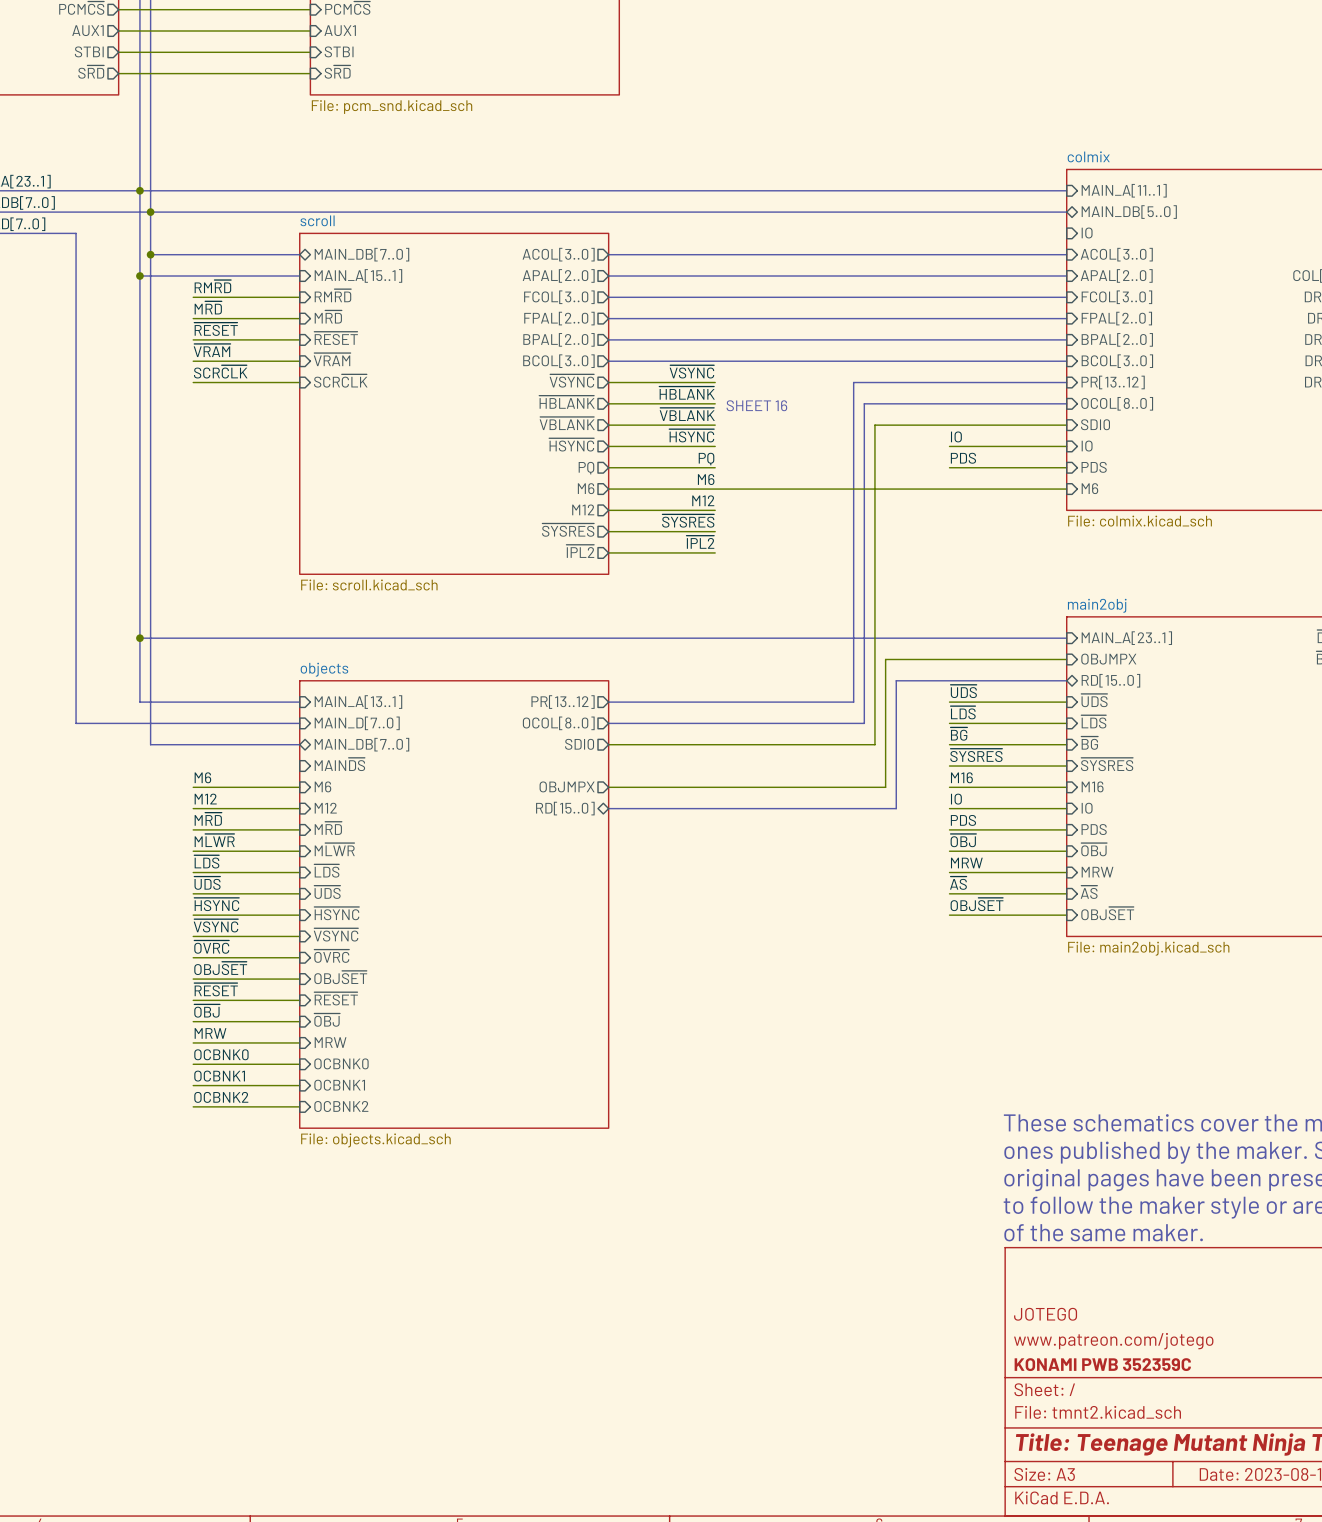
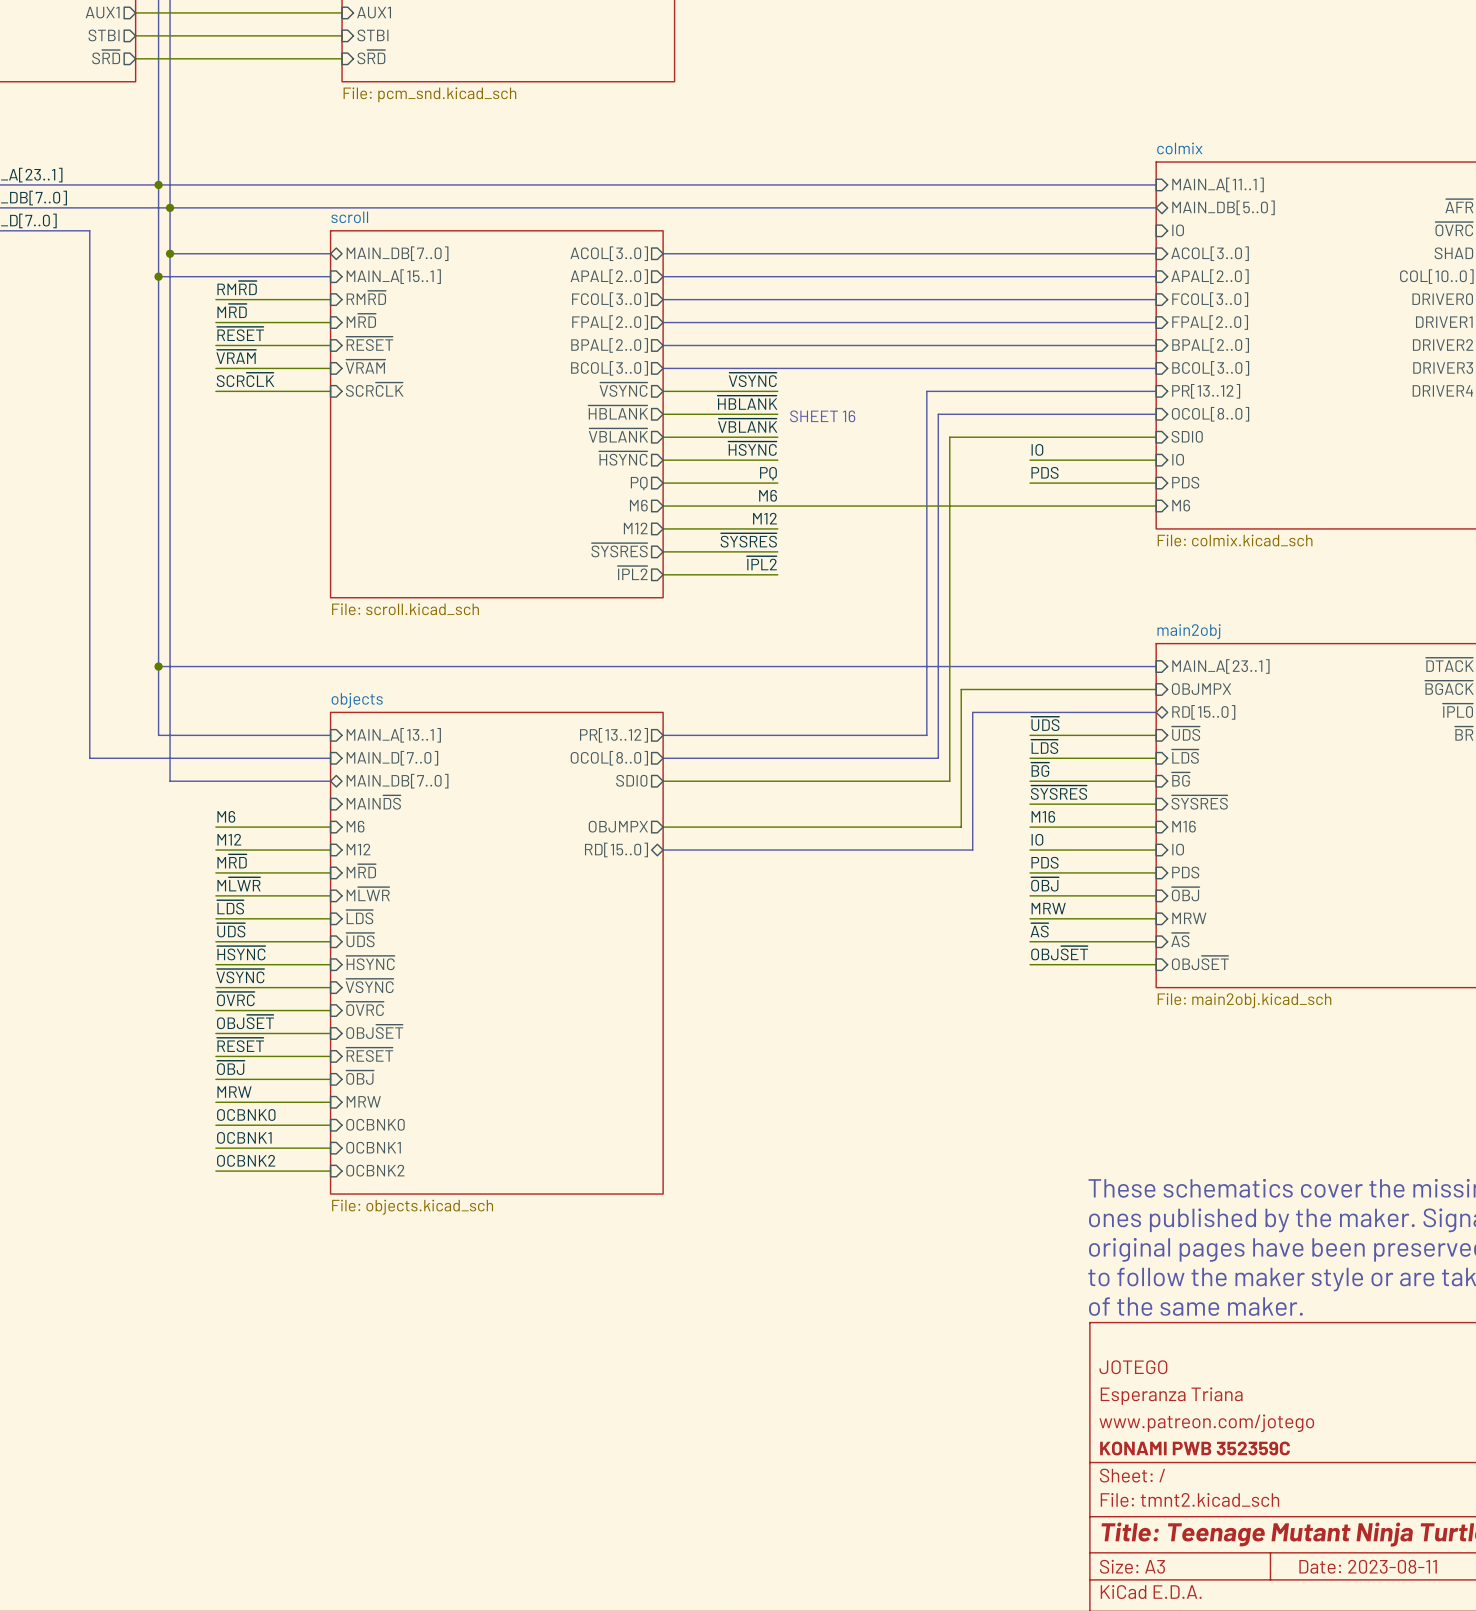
title block: none -> JOTEGO (1133, 1367)
title block: JOTEGO (1045, 1314) -> Esperanza Triana (1171, 1396)

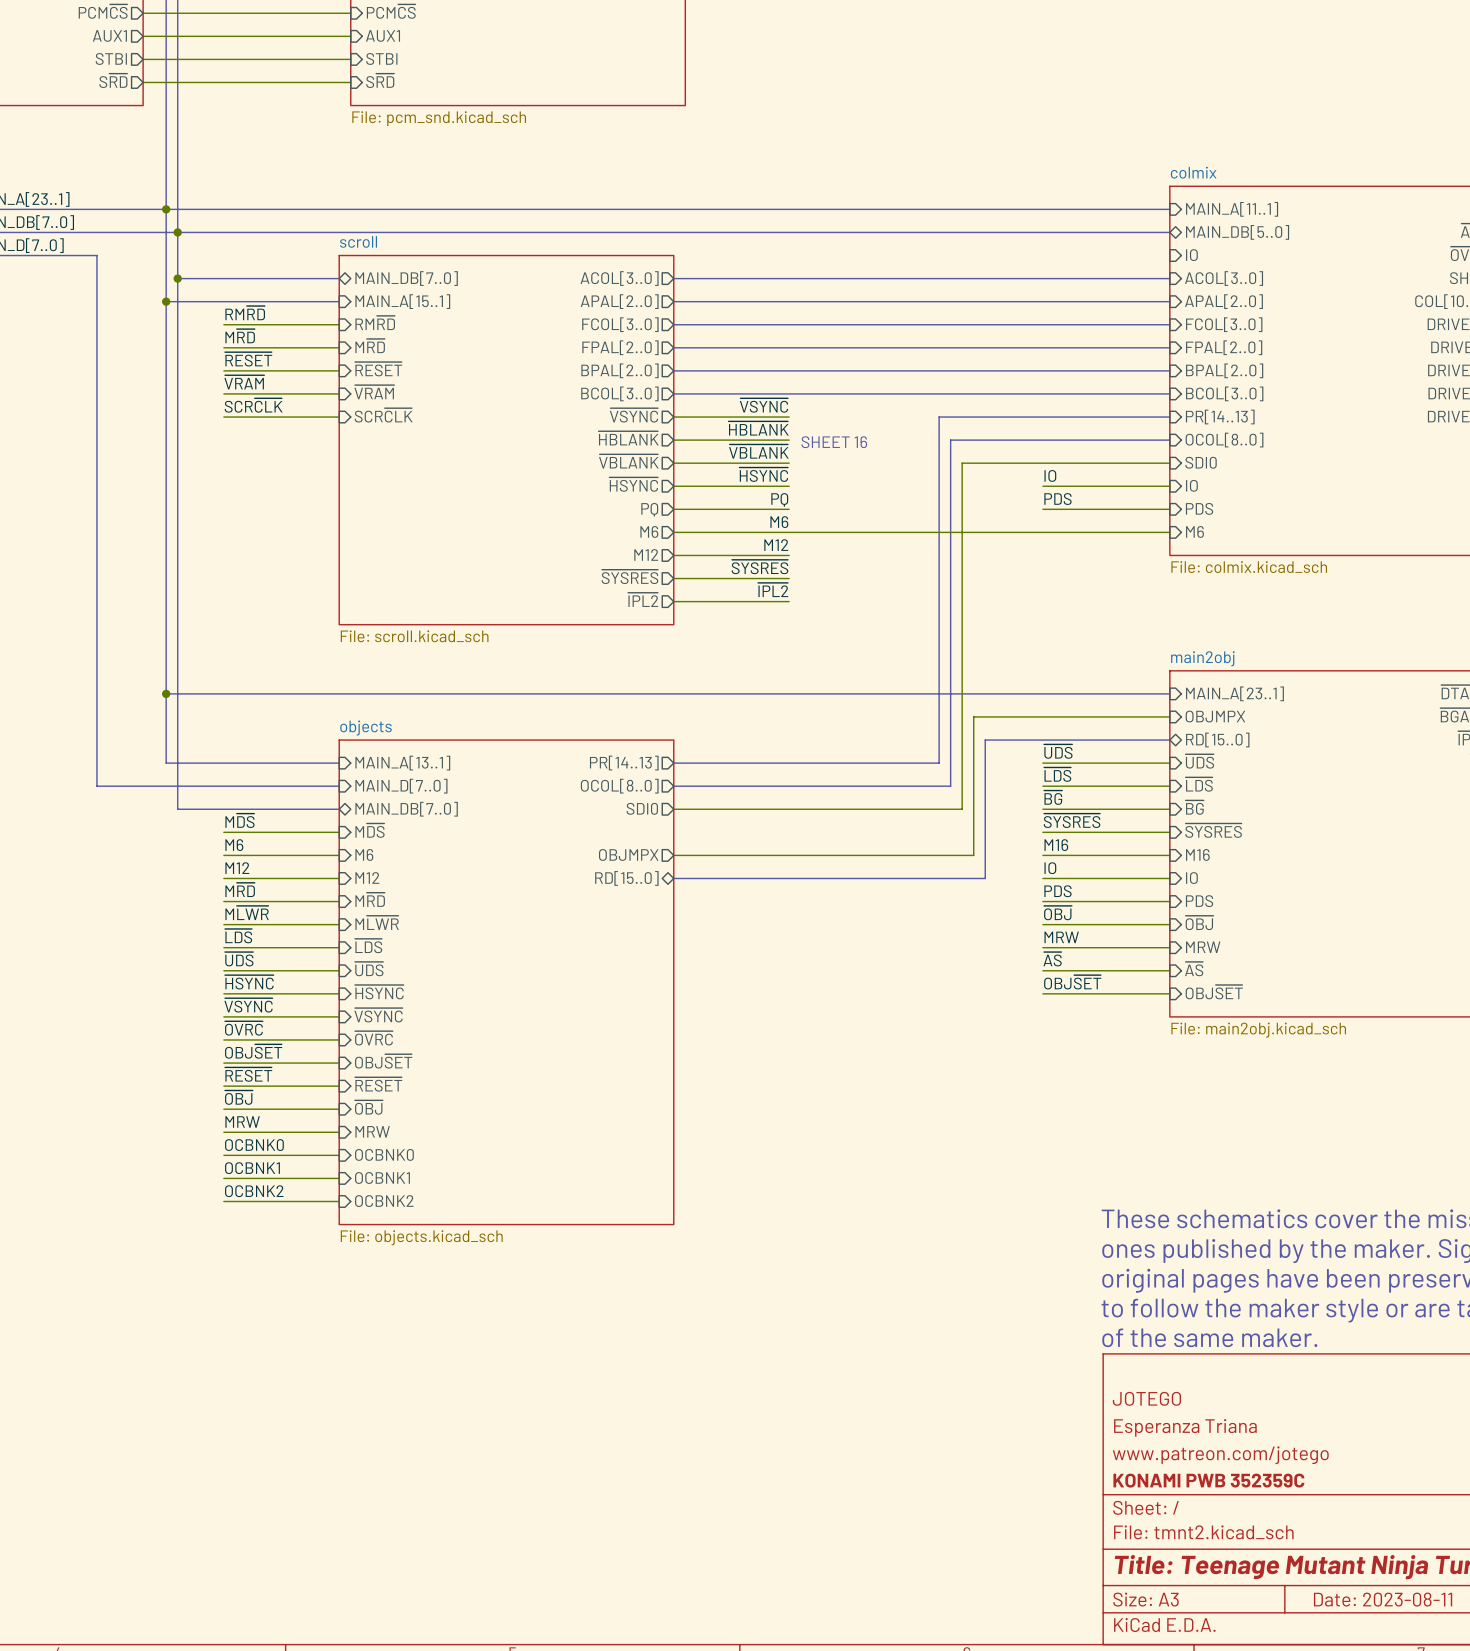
sheet pin: PR[13..12] (1206, 391) -> PR[14..13] (1220, 416)
sheet pin: PR[13..12] (614, 735) -> PR[14..13] (624, 763)
label: none -> M~{DS} (239, 820)
sheet pin: MAIN~{DS} (373, 802) -> M~{DS} (370, 830)
wire: none -> (223, 832) (339, 832)

